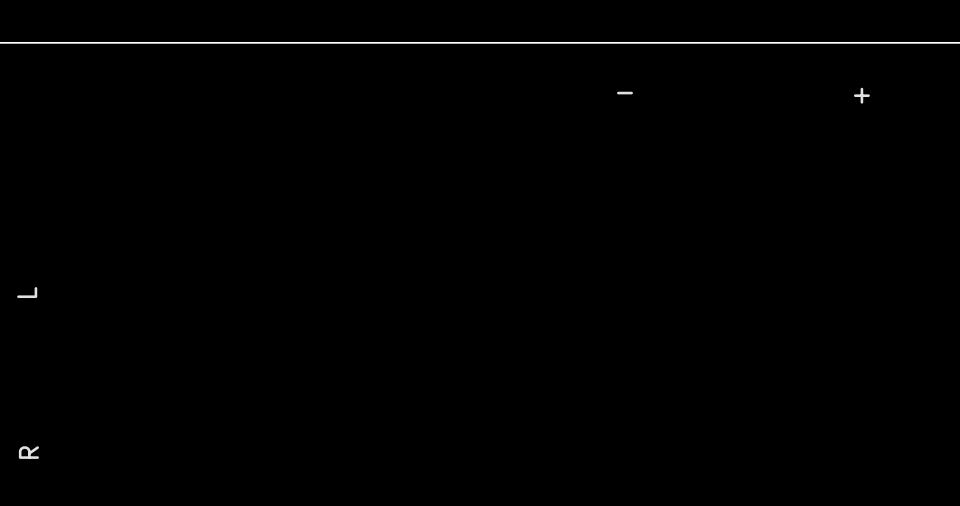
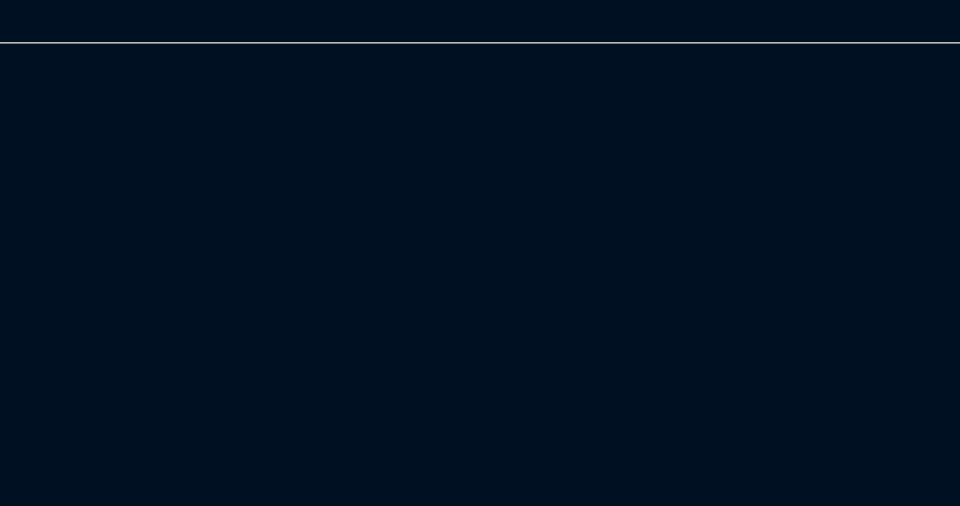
text: - (624, 93) -> none
text: + (861, 95) -> none
text: L (27, 292) -> none
text: R (28, 452) -> none

